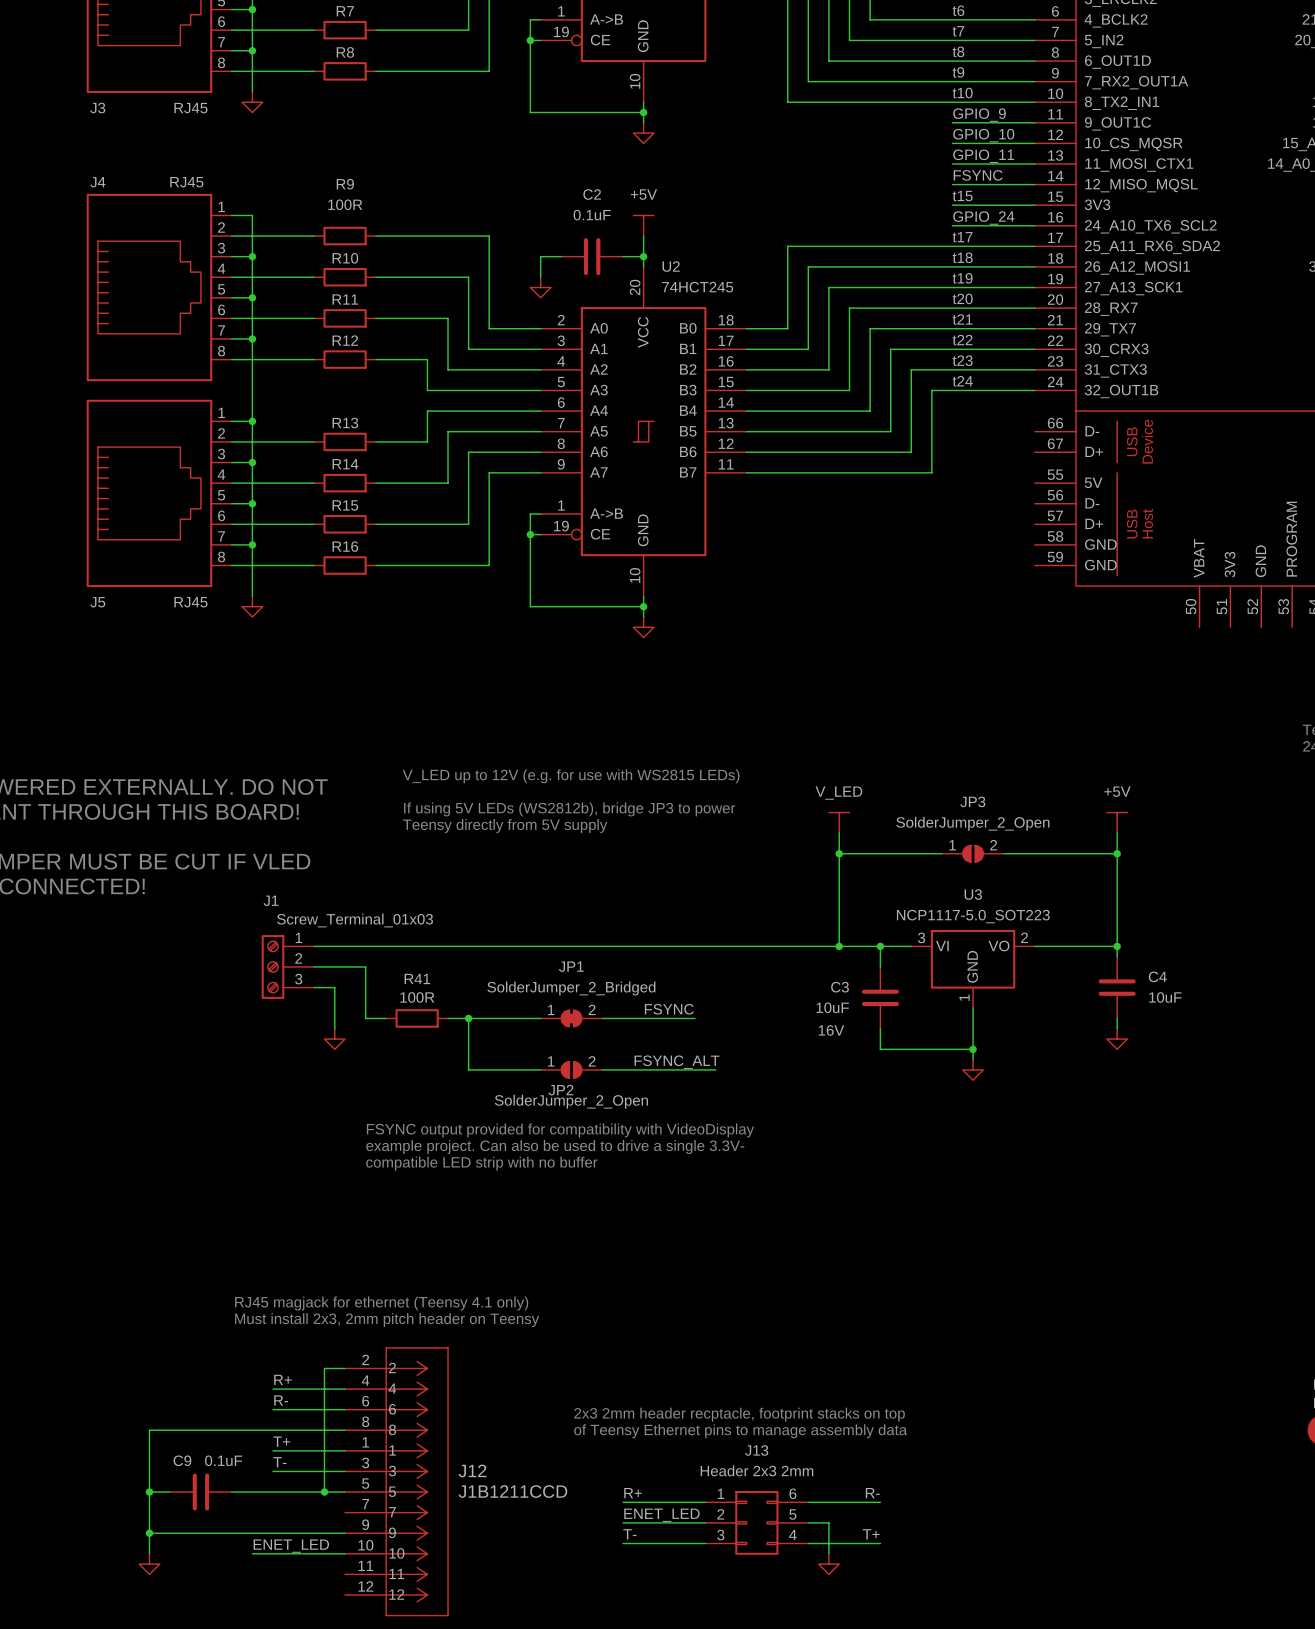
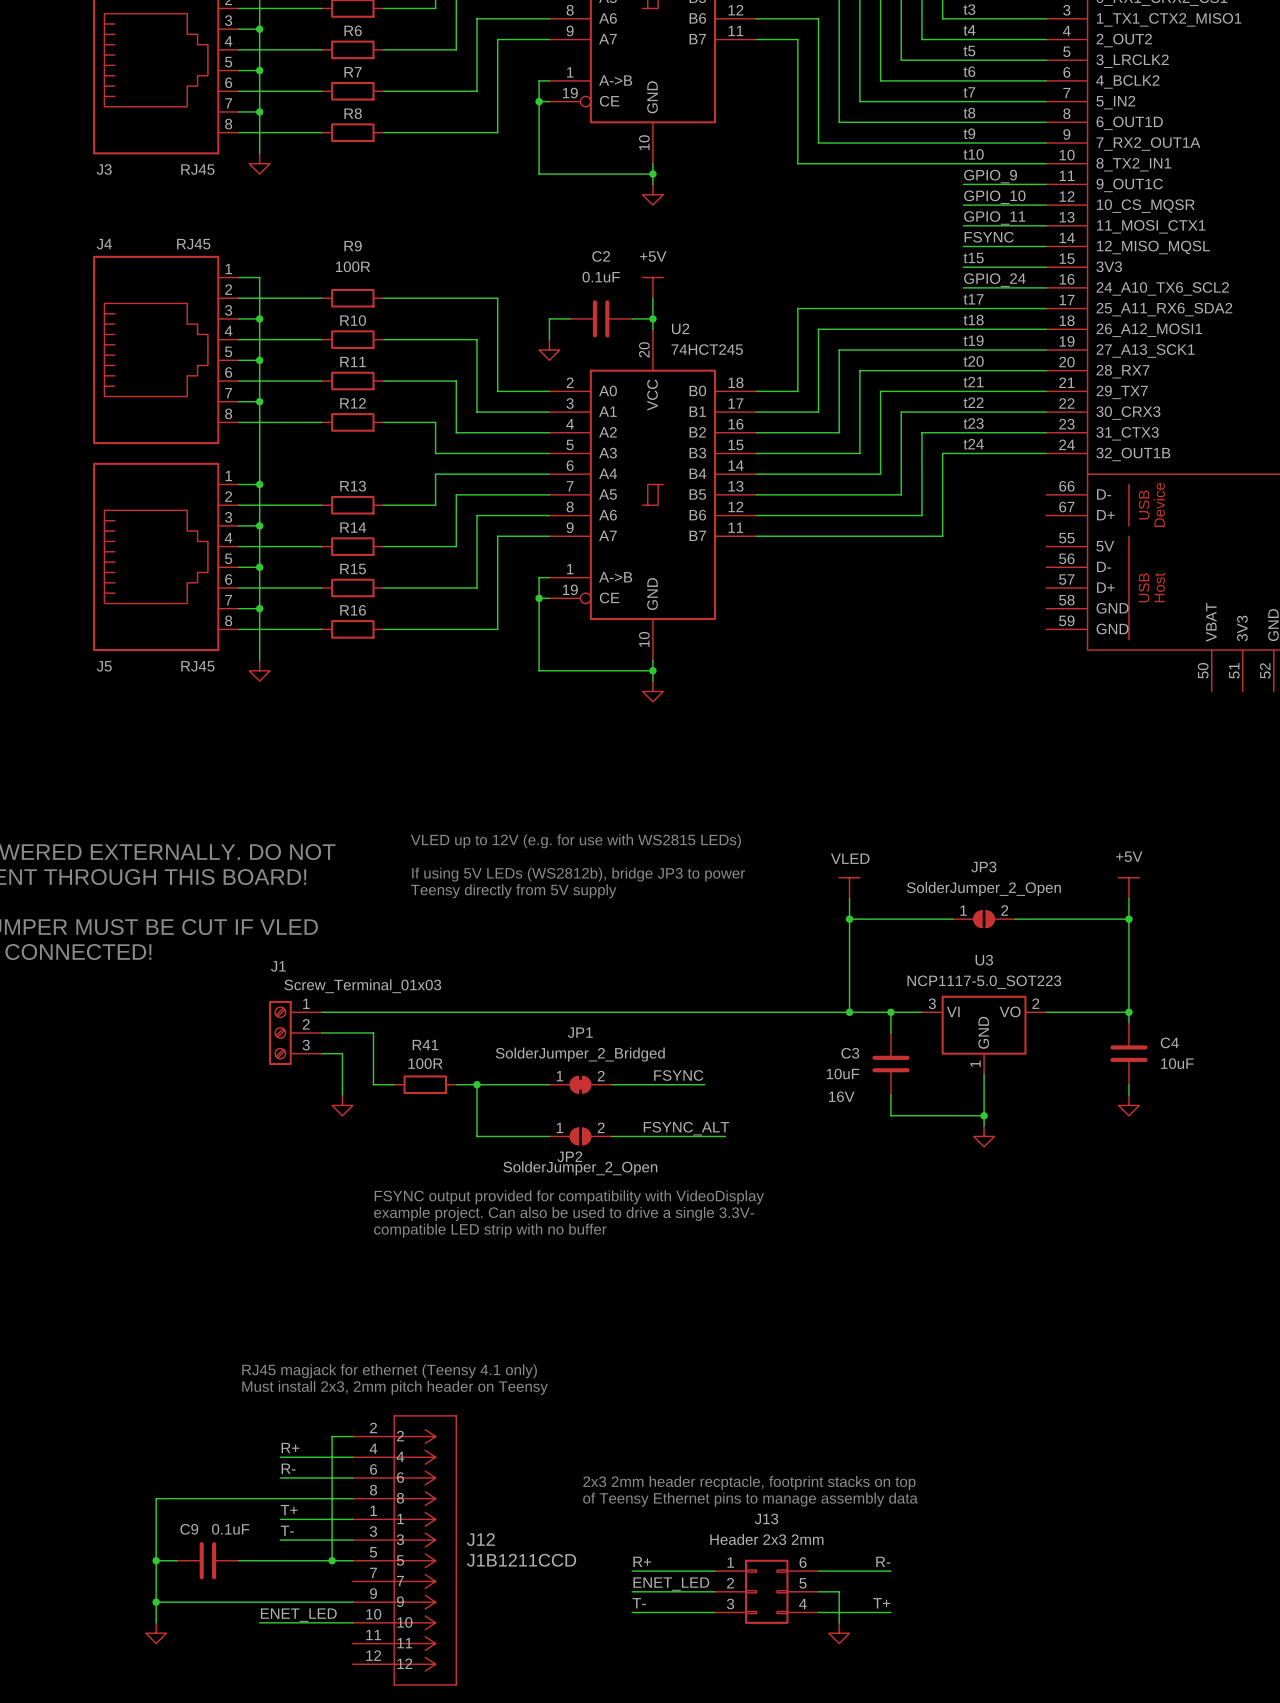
text: V_LED up to 12V (e.g. for use with WS2815 LEDs) (571, 776) -> VLED up to 12V (e.g. for use with WS2815 LEDs) (575, 841)
power symbol: V_LED (839, 822) -> VLED (849, 888)

